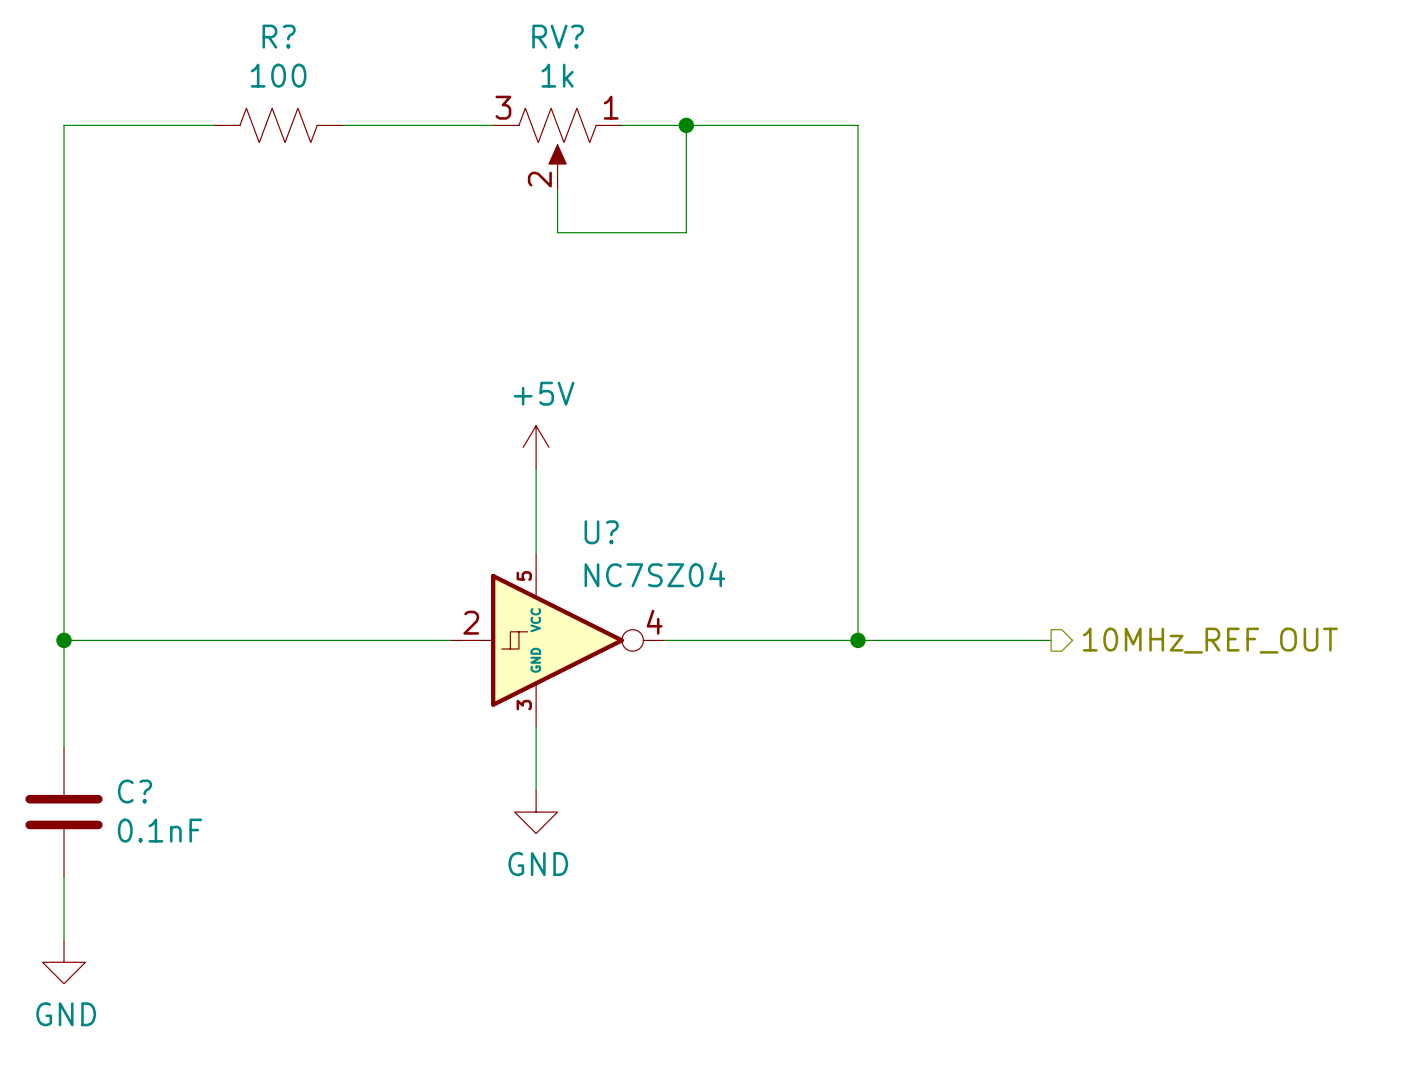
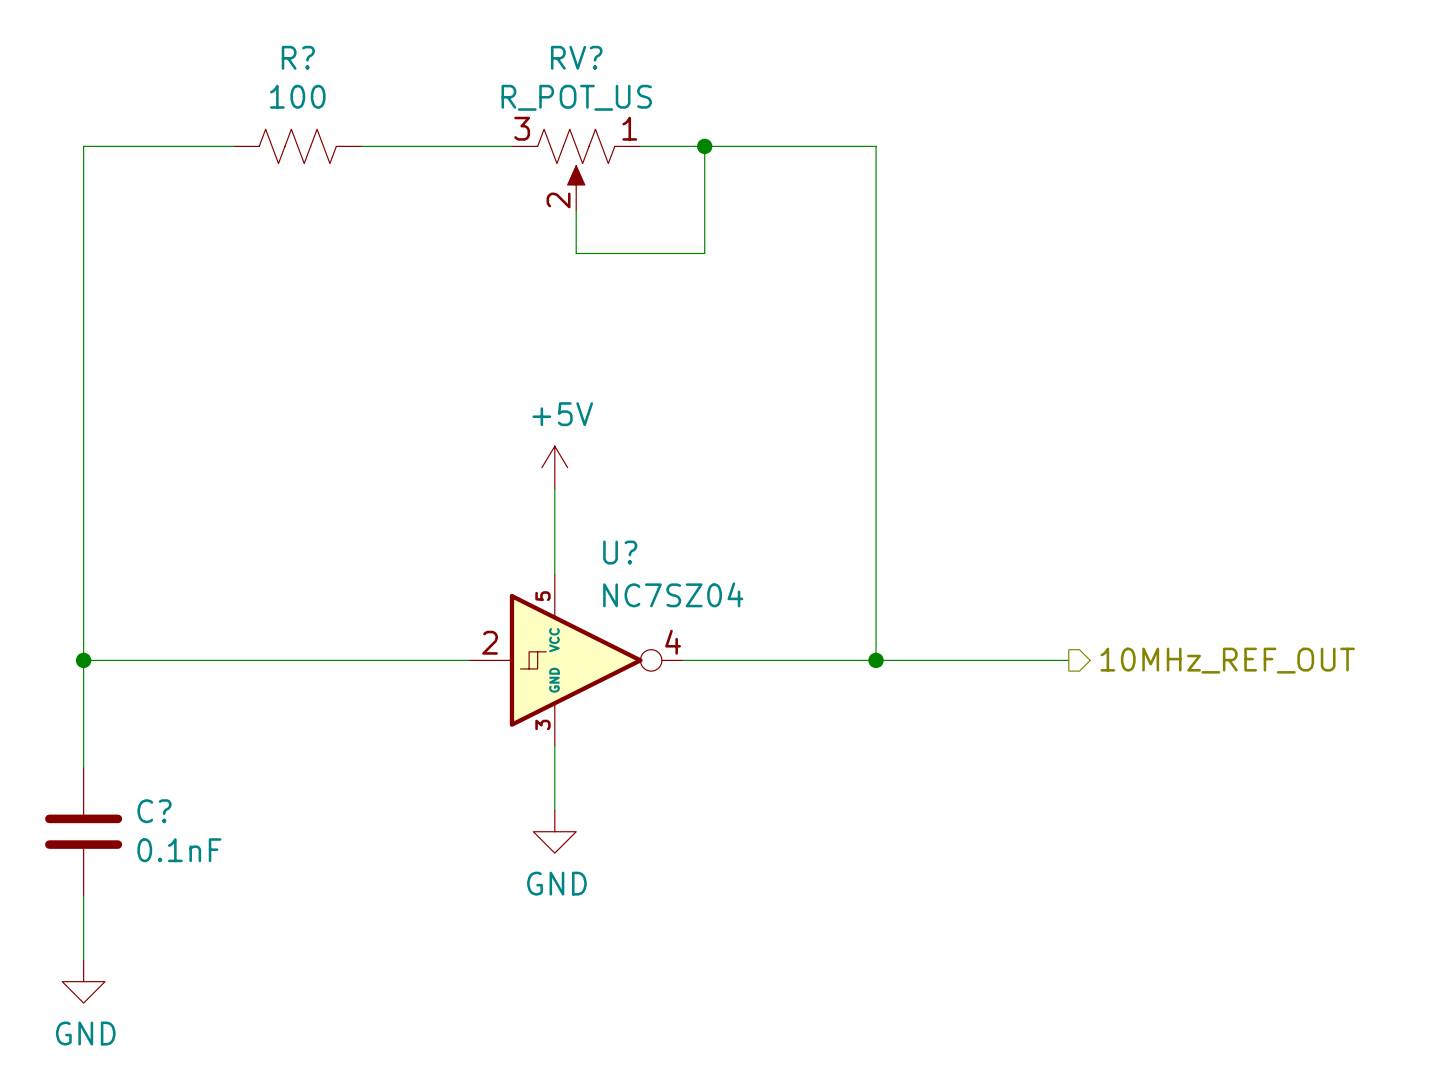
RV? value: 1k (557, 75) -> R_POT_US (576, 97)

